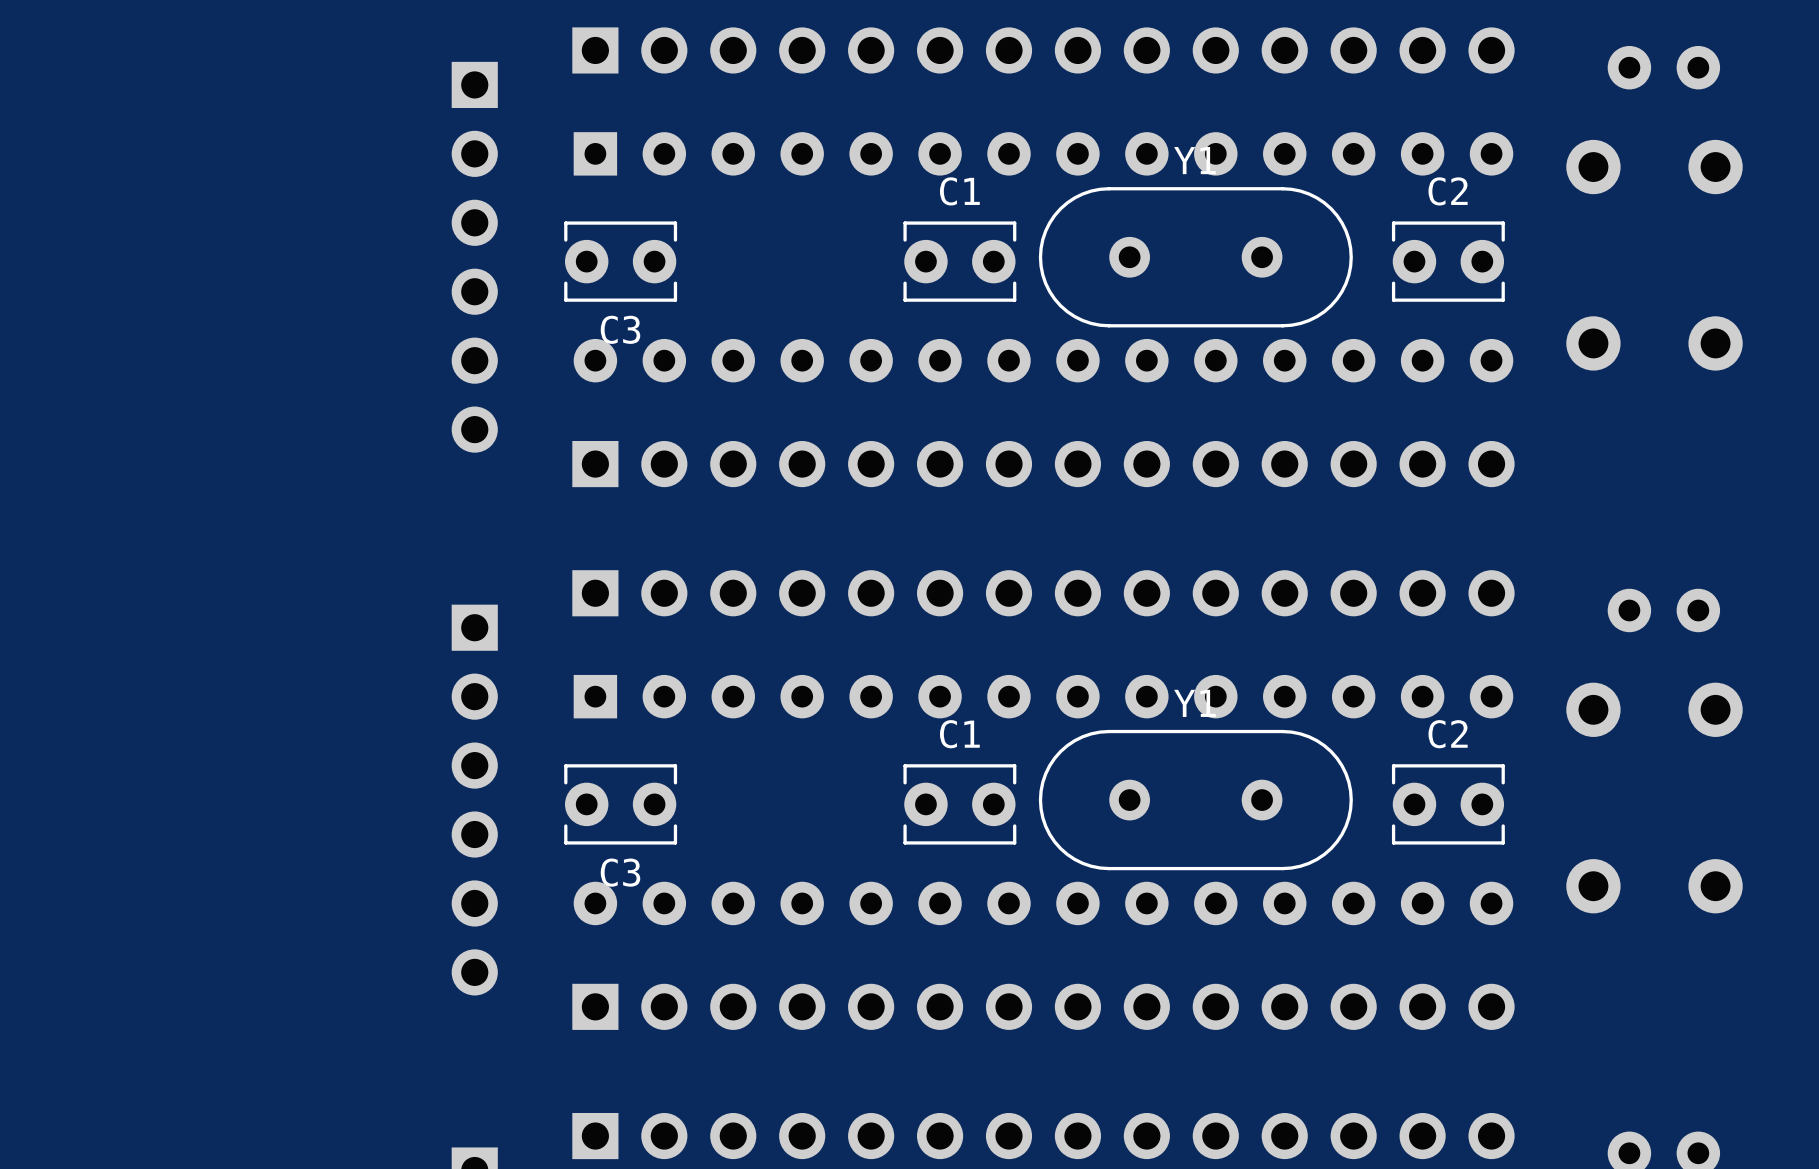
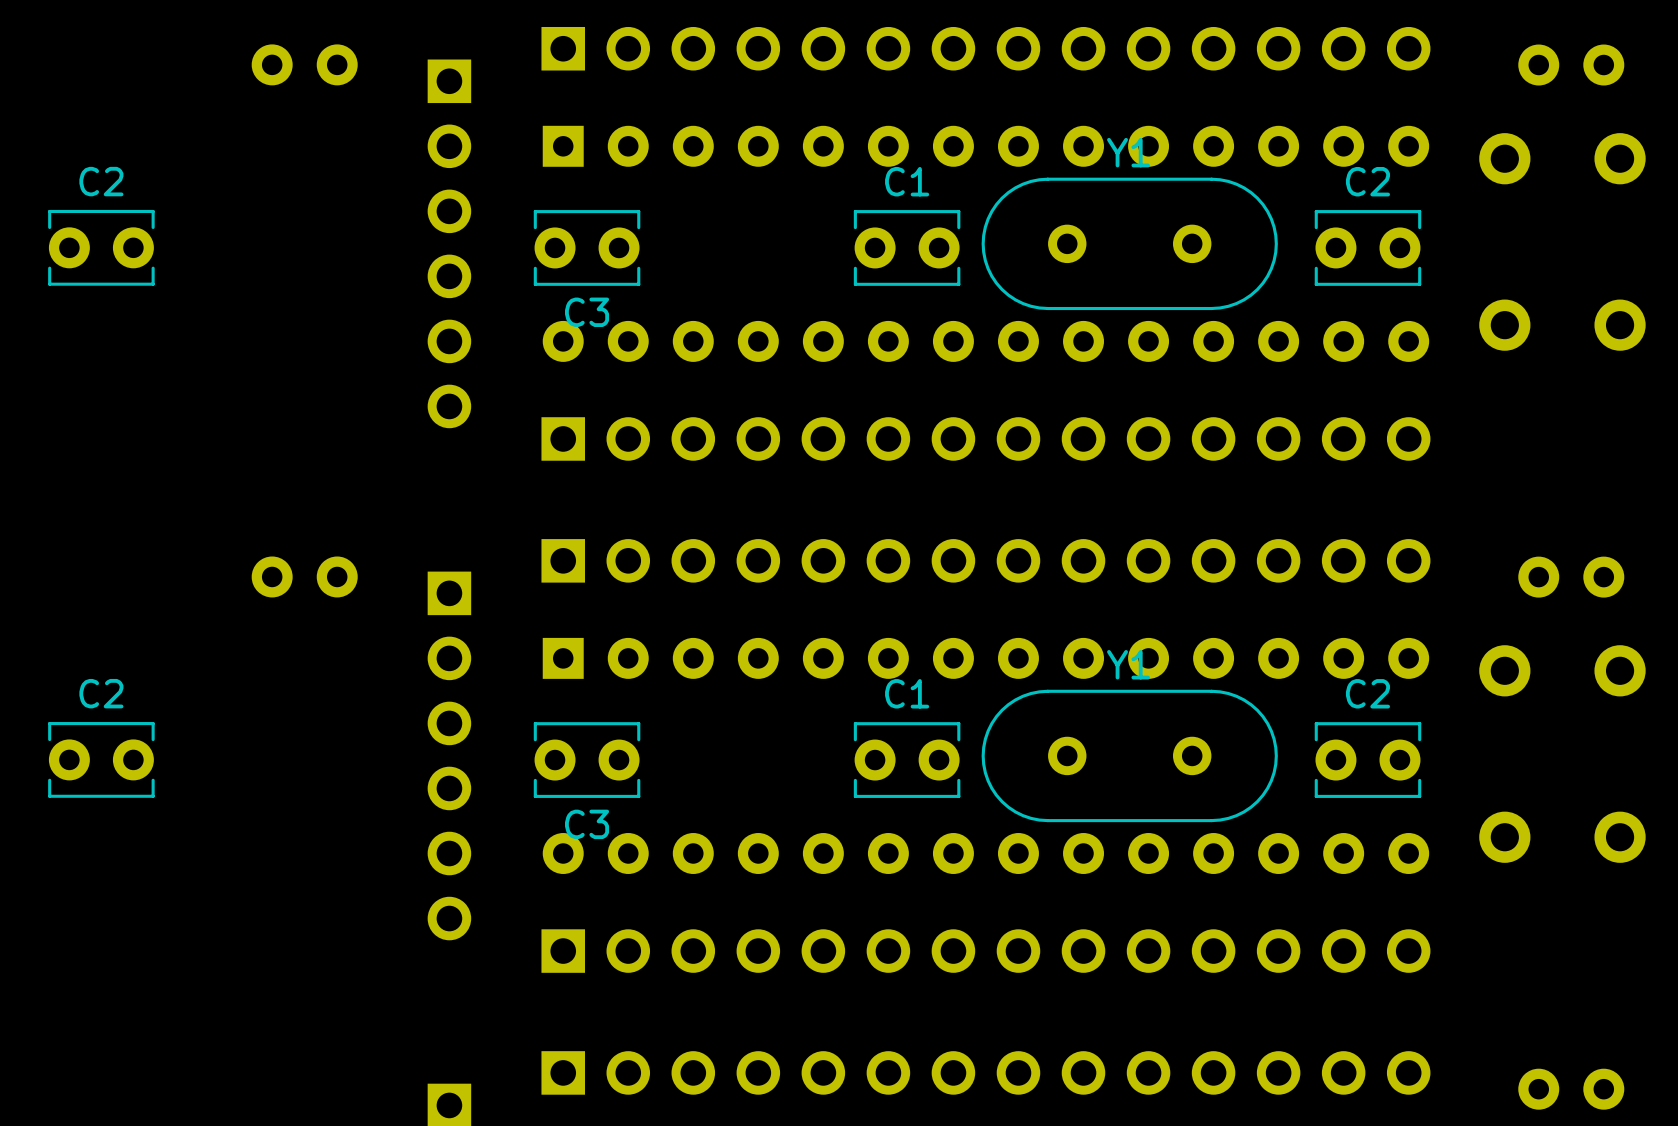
part: none -> (304, 64)
C2: none -> (101, 247)
part: none -> (304, 576)
C2: none -> (101, 759)

